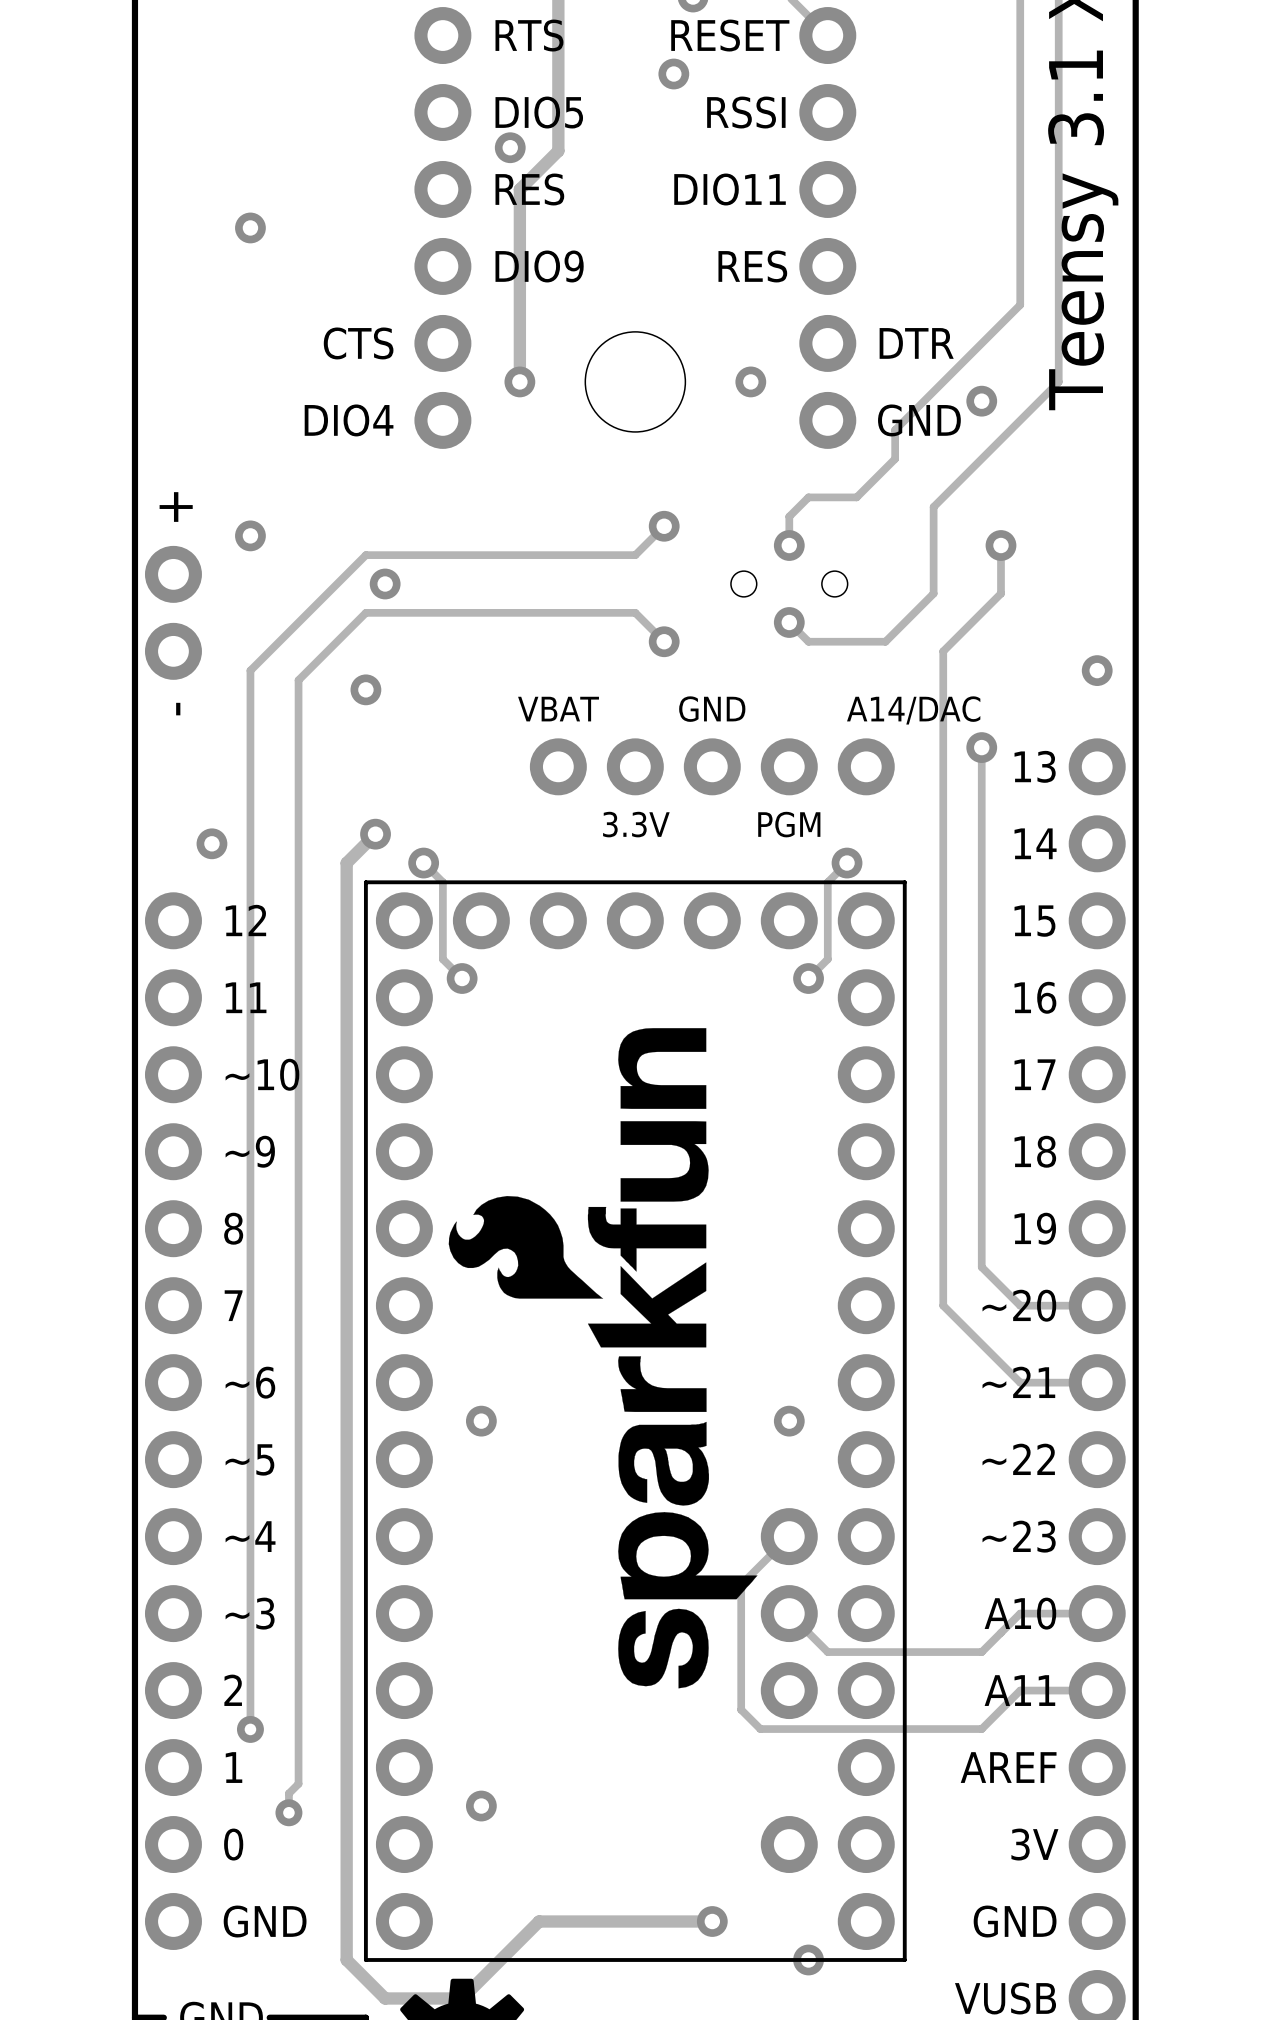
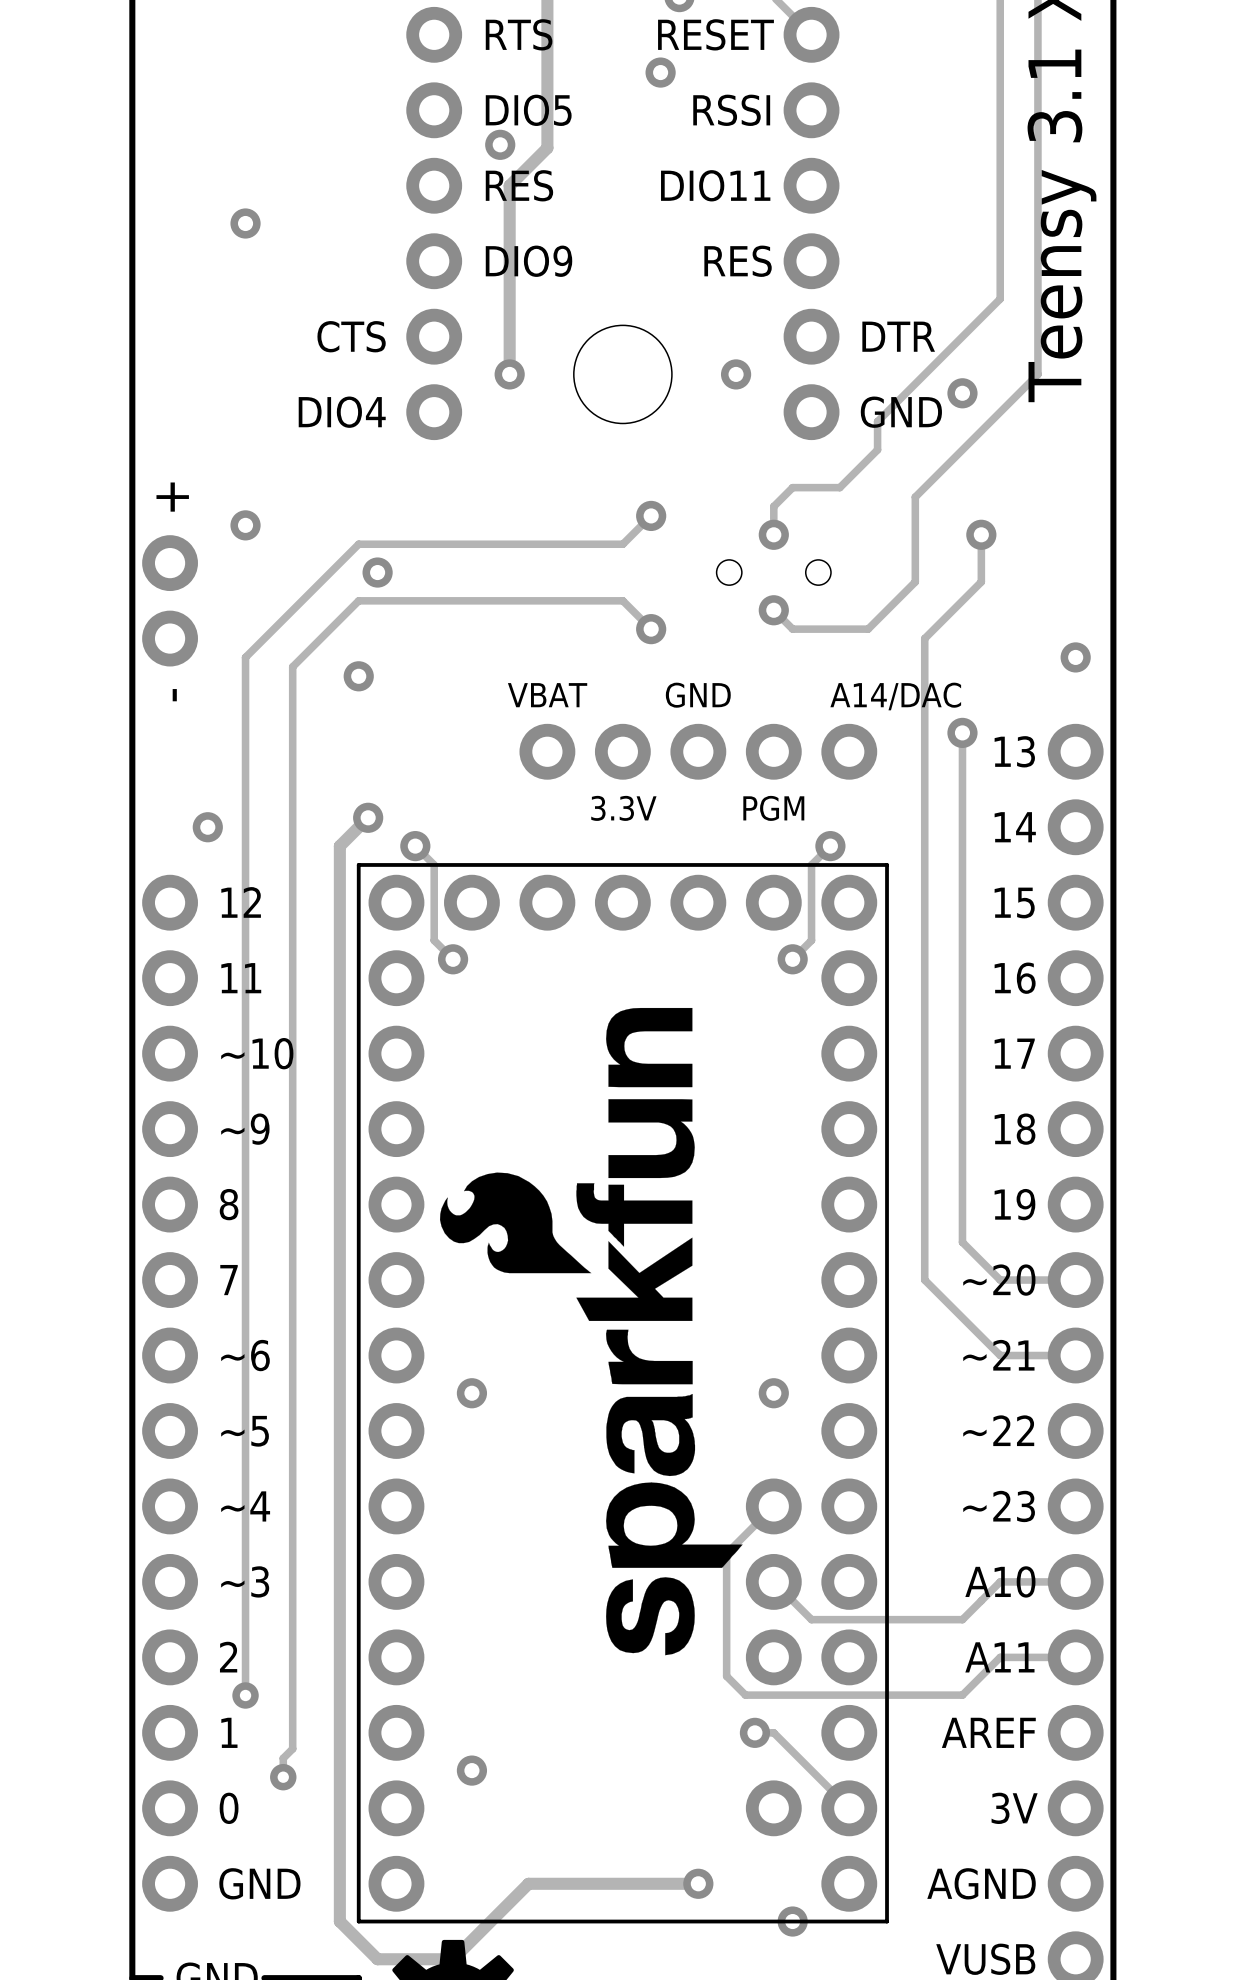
track: none -> (754, 1732) (773, 1732) (849, 1808)
via: none -> (754, 1732)
text: GND (1015, 1921) -> AGND (981, 1883)

